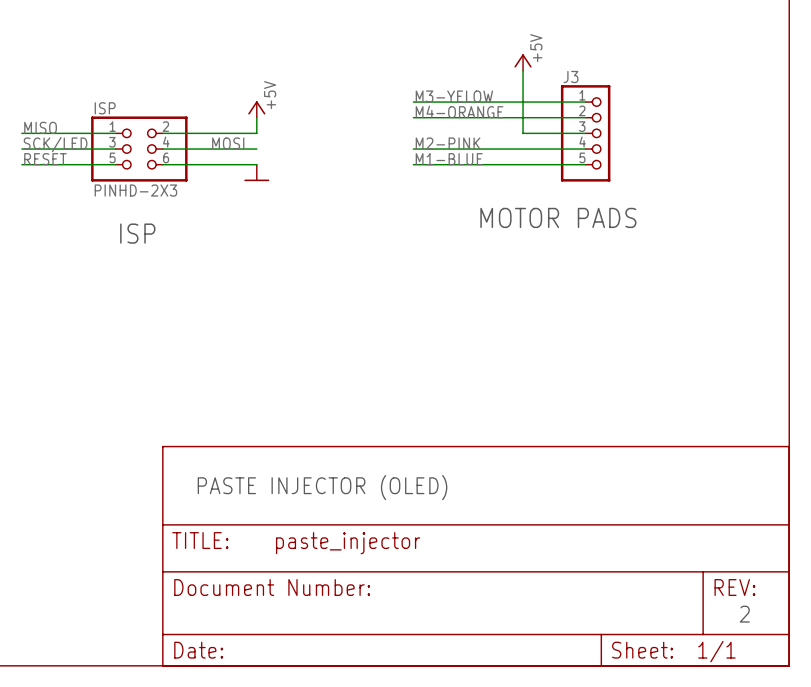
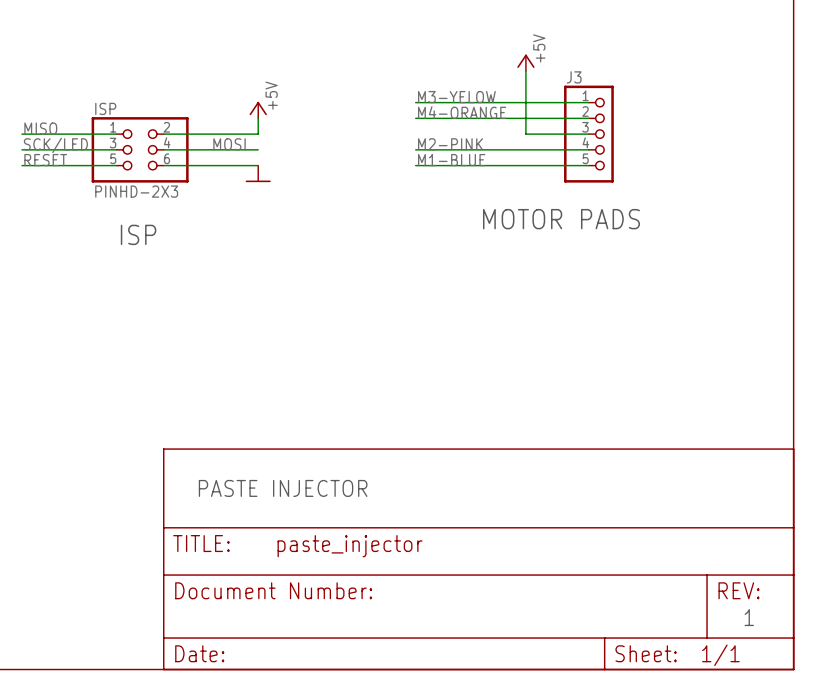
text: PASTE INJECTOR (OLED) (322, 487) -> PASTE INJECTOR (283, 488)
text: 2 (744, 614) -> 1 (749, 617)

